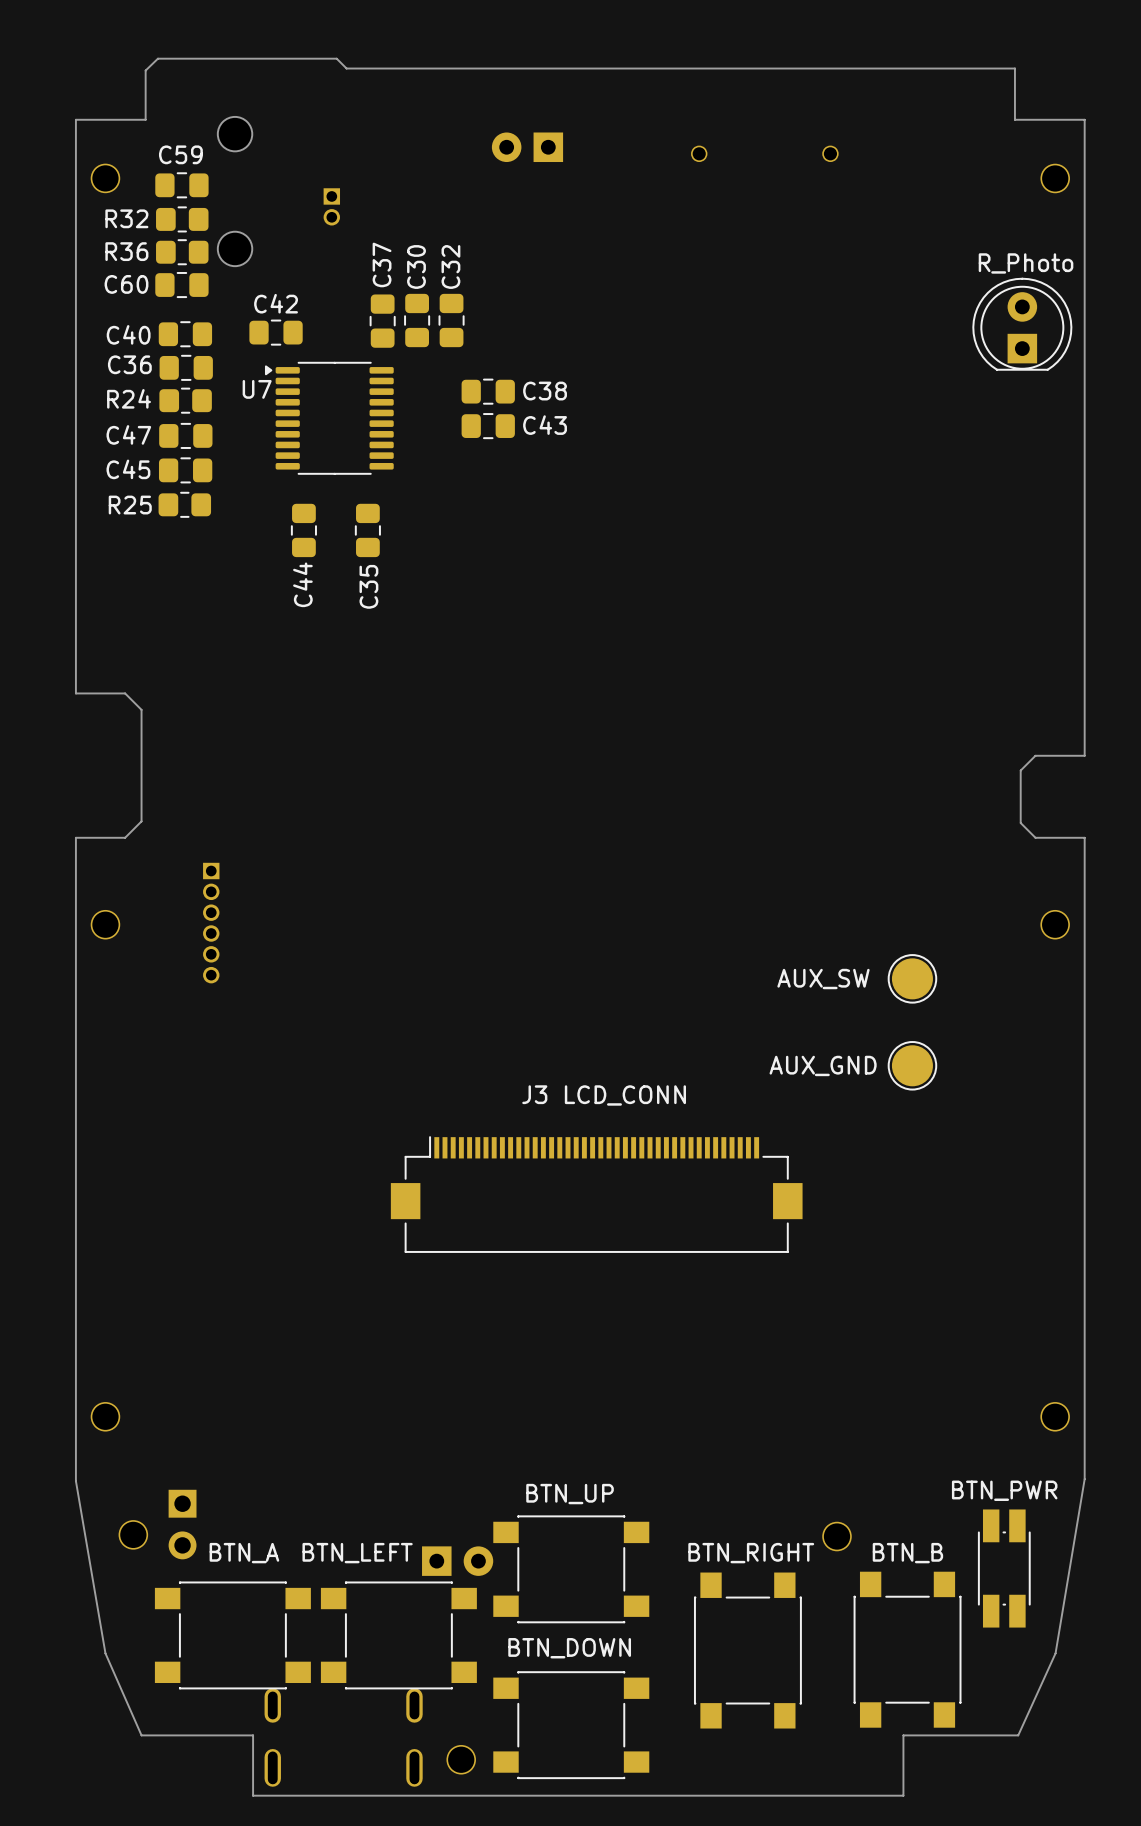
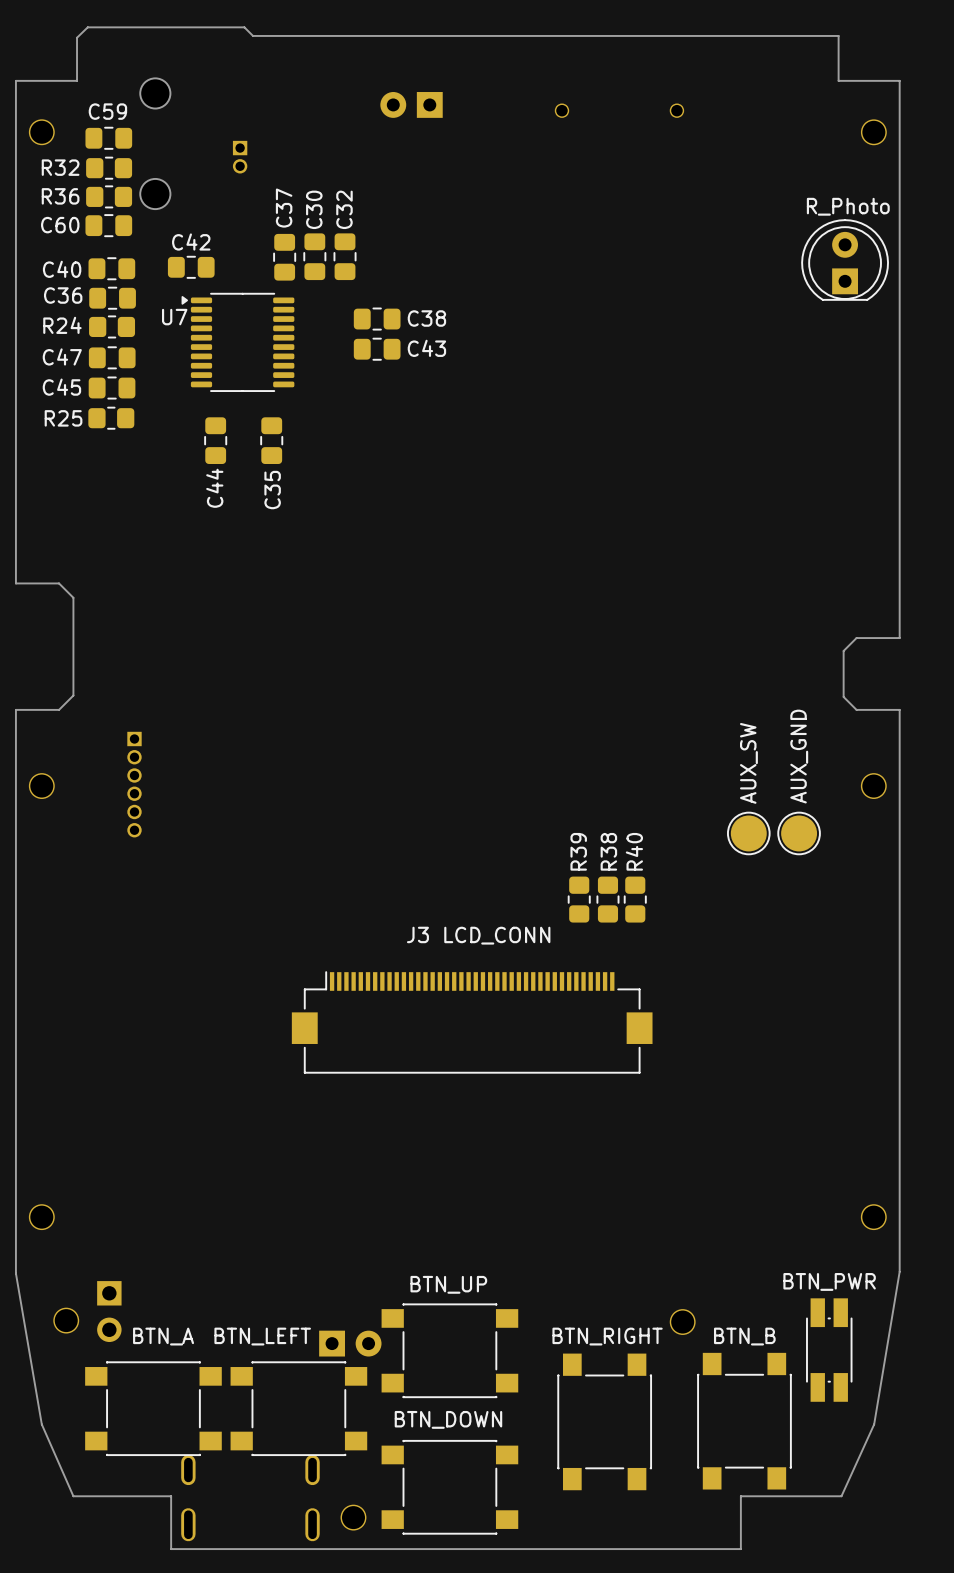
part value rotation: 0° (823, 979) -> 90° counterclockwise (748, 763)
part value position: AUX_SW (823, 979) -> AUX_SW (748, 763)
R39: none -> (579, 899)
R38: none -> (607, 899)
R40: none -> (635, 899)
part value rotation: 0° (823, 1065) -> 90° counterclockwise (799, 756)
part position: (912, 1065) -> (799, 833)

